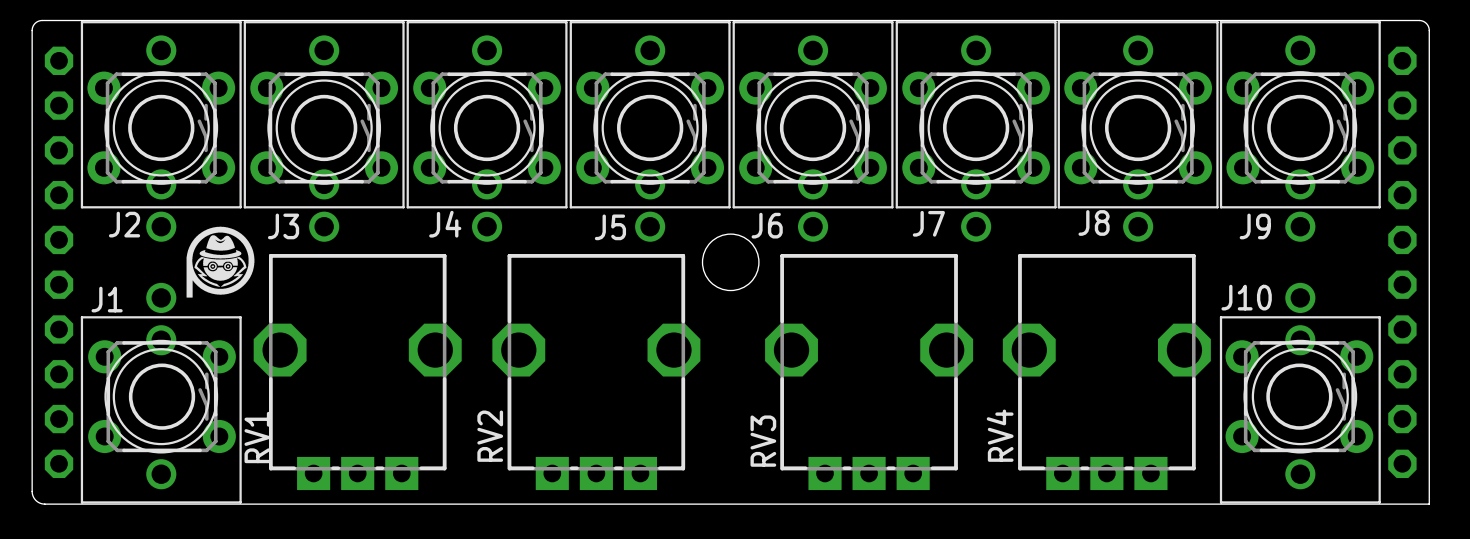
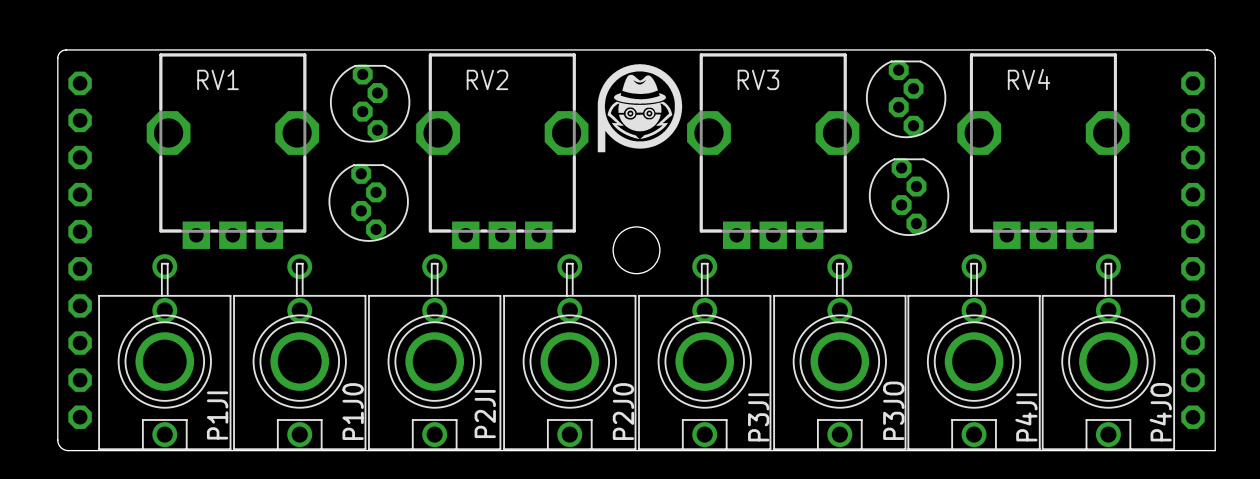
drawing: none -> [597, 64, 683, 153]
part: none -> (906, 99)
part: none -> (370, 103)
part: (161, 127) -> none
part: (324, 127) -> none
part: (487, 127) -> none
part: (650, 127) -> none
part: (813, 127) -> none
part: (976, 127) -> none
part: (1138, 127) -> none
part: (1300, 127) -> none
J2: (161, 131) -> none
J3: (324, 131) -> none
J4: (487, 131) -> none
J5: (650, 131) -> none
J6: (813, 131) -> none
J7: (976, 131) -> none
J8: (1138, 131) -> none
J9: (1300, 131) -> none
part: none -> (909, 197)
part: none -> (368, 202)
drawing: [186, 226, 255, 298] -> none
RV1 position: (357, 372) -> (232, 151)
RV2 position: (596, 372) -> (502, 151)
RV3 position: (869, 372) -> (773, 151)
RV4 position: (1106, 372) -> (1043, 151)
P1JI: none -> (164, 352)
P1J0: none -> (299, 352)
P2JI: none -> (434, 352)
P2J0: none -> (569, 352)
P3JI: none -> (704, 352)
P3JO: none -> (839, 352)
P4JI: none -> (974, 352)
P4JO: none -> (1108, 352)
J1: (161, 393) -> none
J10: (1300, 393) -> none
part: (162, 396) -> none
part: (1299, 396) -> none
RV4 name rotation: 0° (1000, 435) -> 90° clockwise (1029, 79)
RV4 name position: RV4 (1000, 435) -> RV4 (1029, 79)
RV2 name rotation: 0° (490, 436) -> 90° clockwise (487, 79)
RV2 name position: RV2 (490, 436) -> RV2 (487, 79)
RV1 name rotation: 0° (257, 437) -> 90° clockwise (218, 79)
RV1 name position: RV1 (257, 437) -> RV1 (218, 79)
RV3 name rotation: 0° (763, 441) -> 90° clockwise (758, 79)
RV3 name position: RV3 (763, 441) -> RV3 (758, 79)

